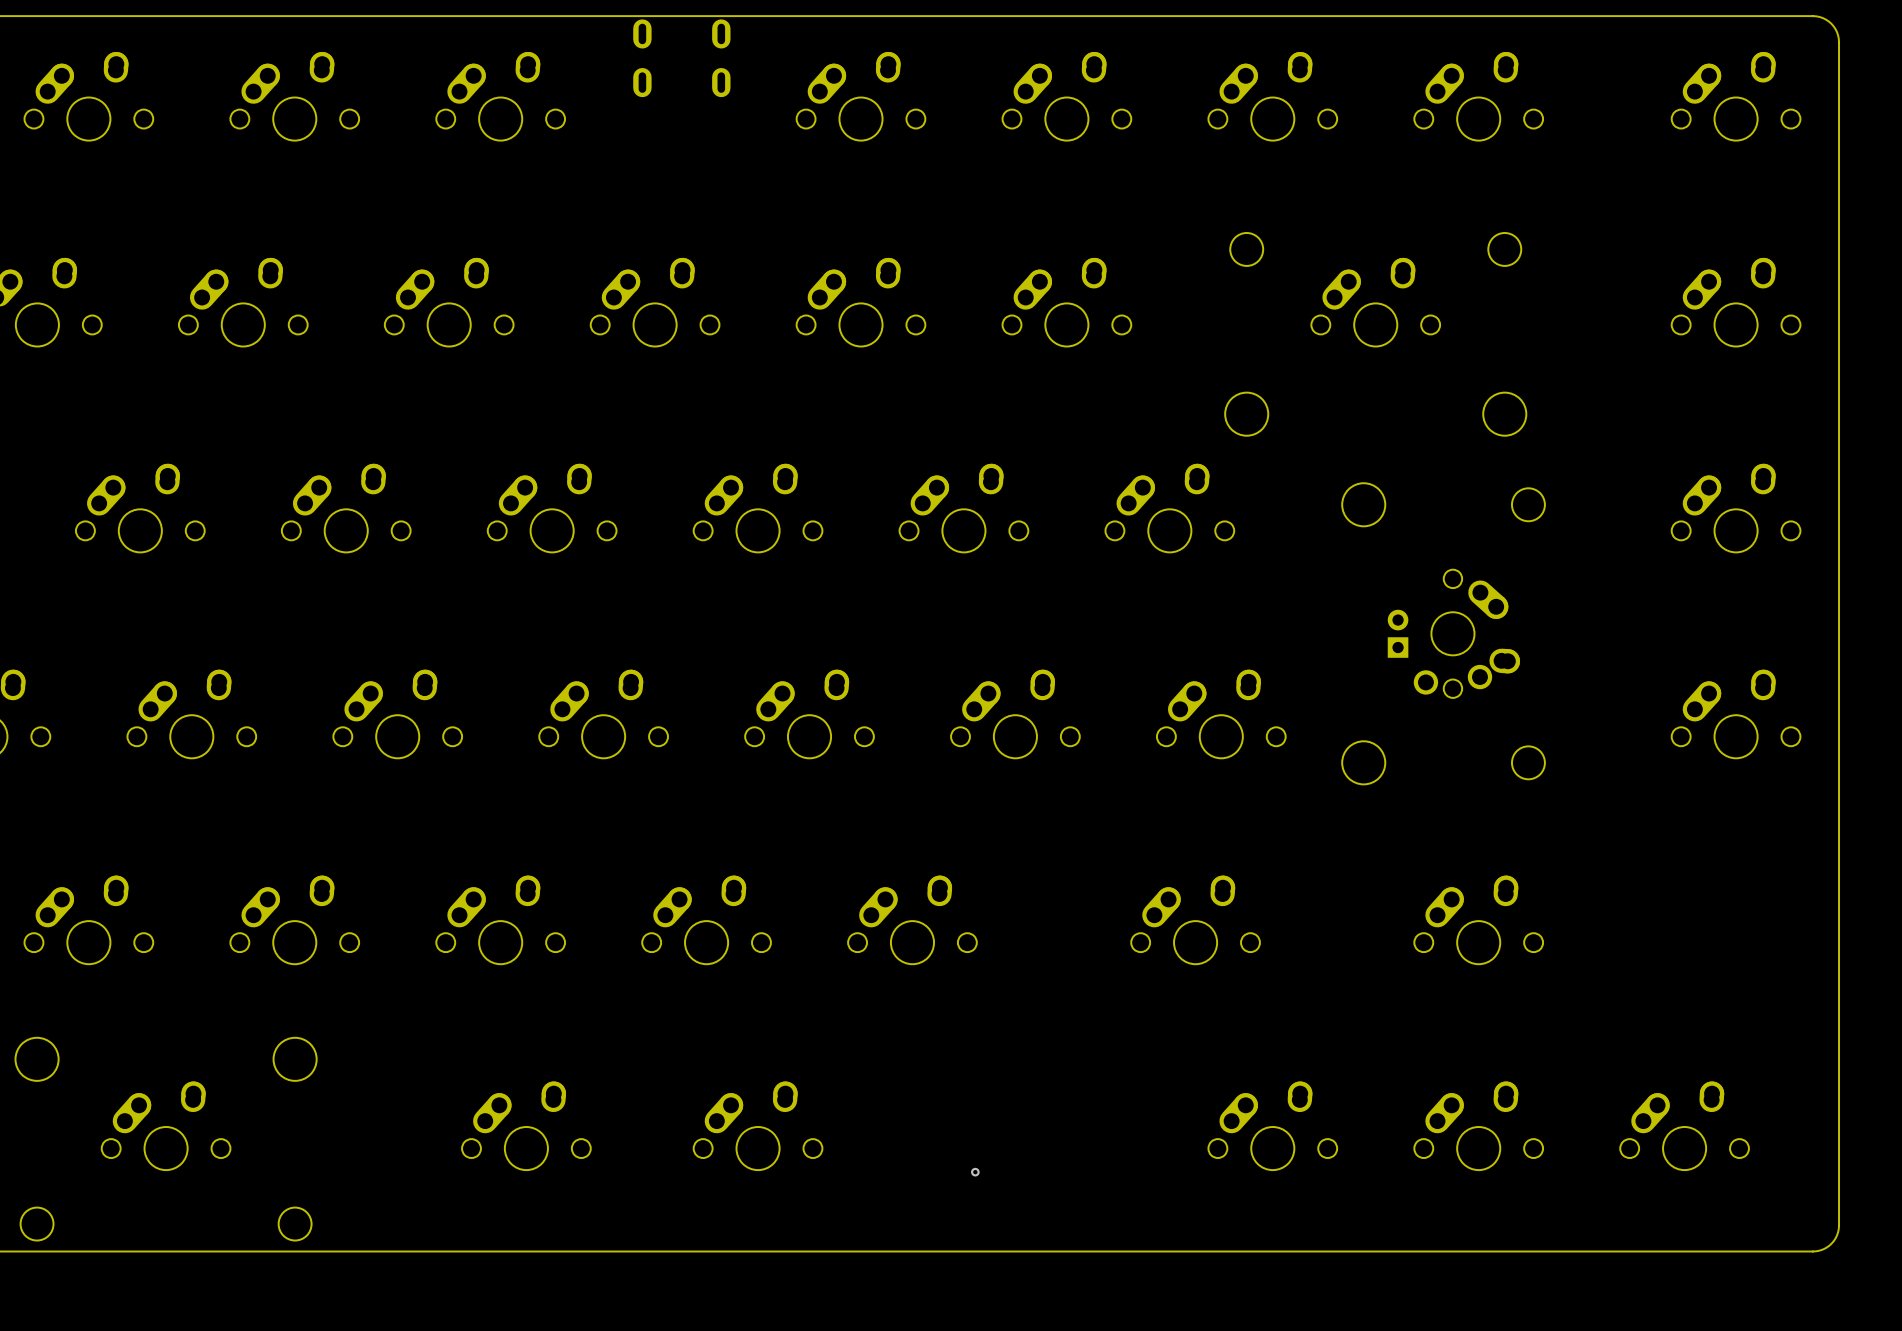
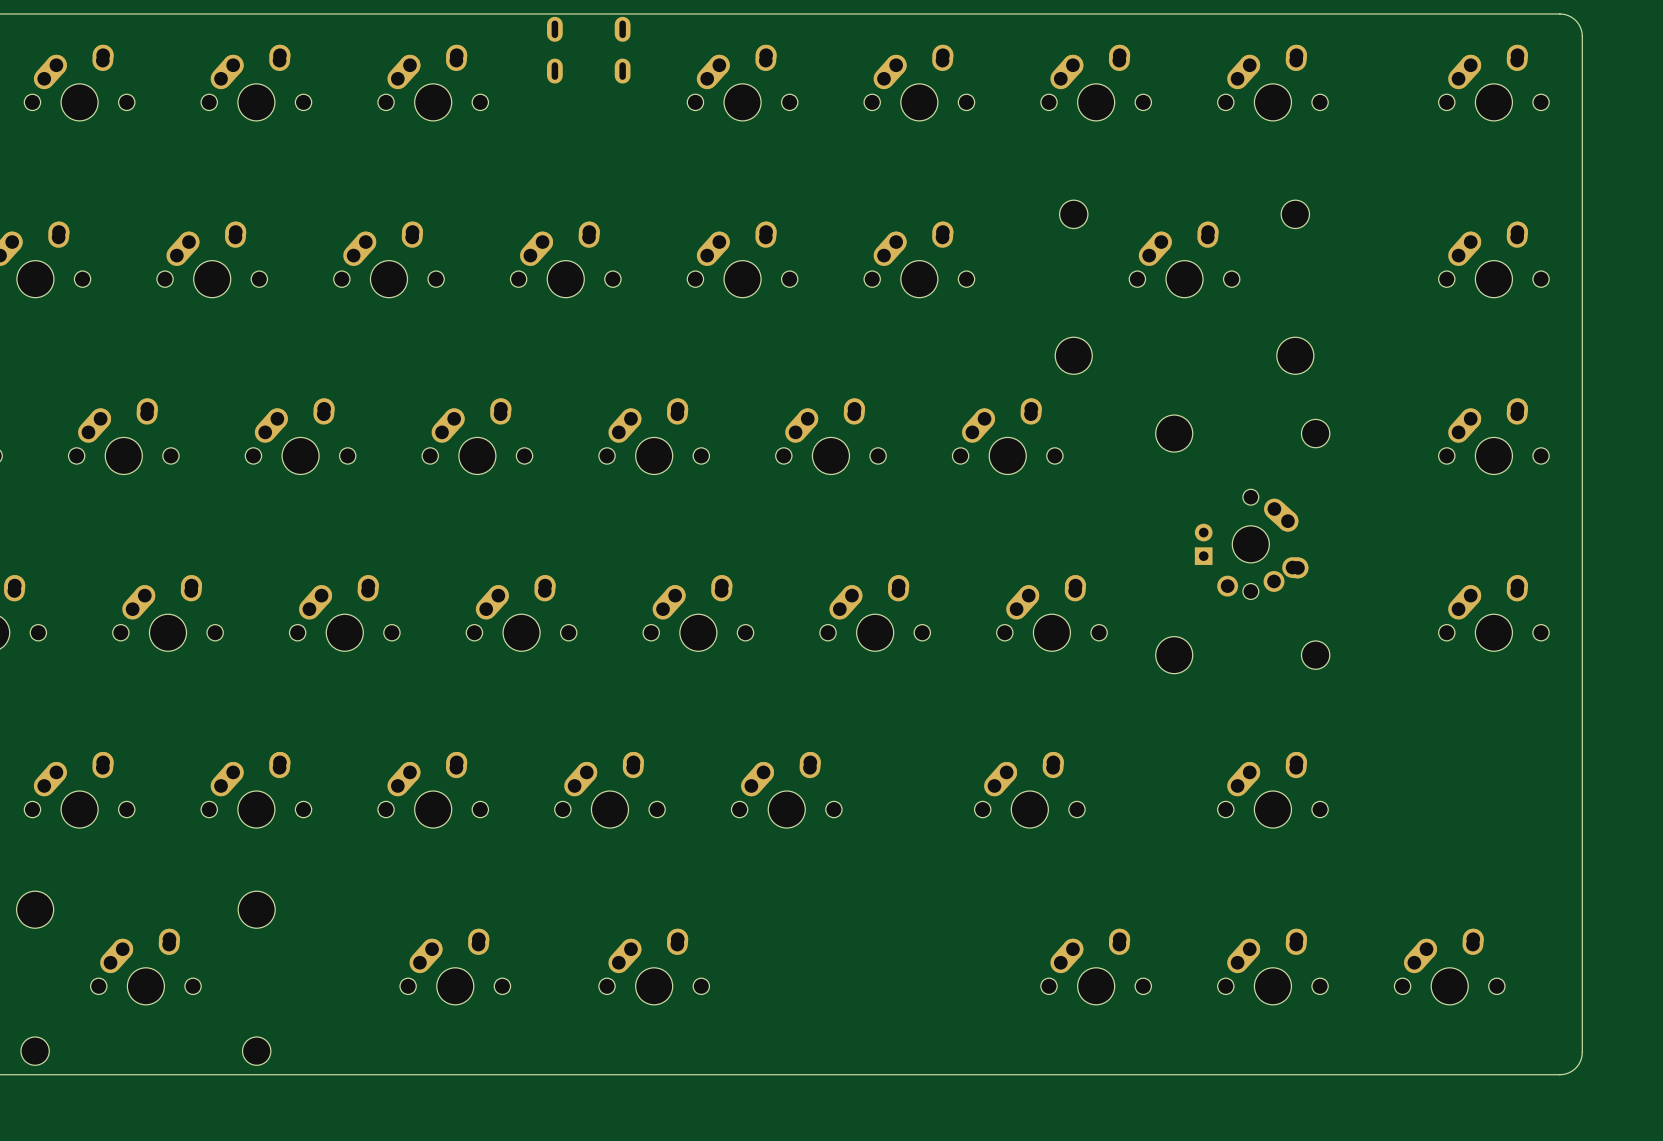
via: (975, 1172) -> none

